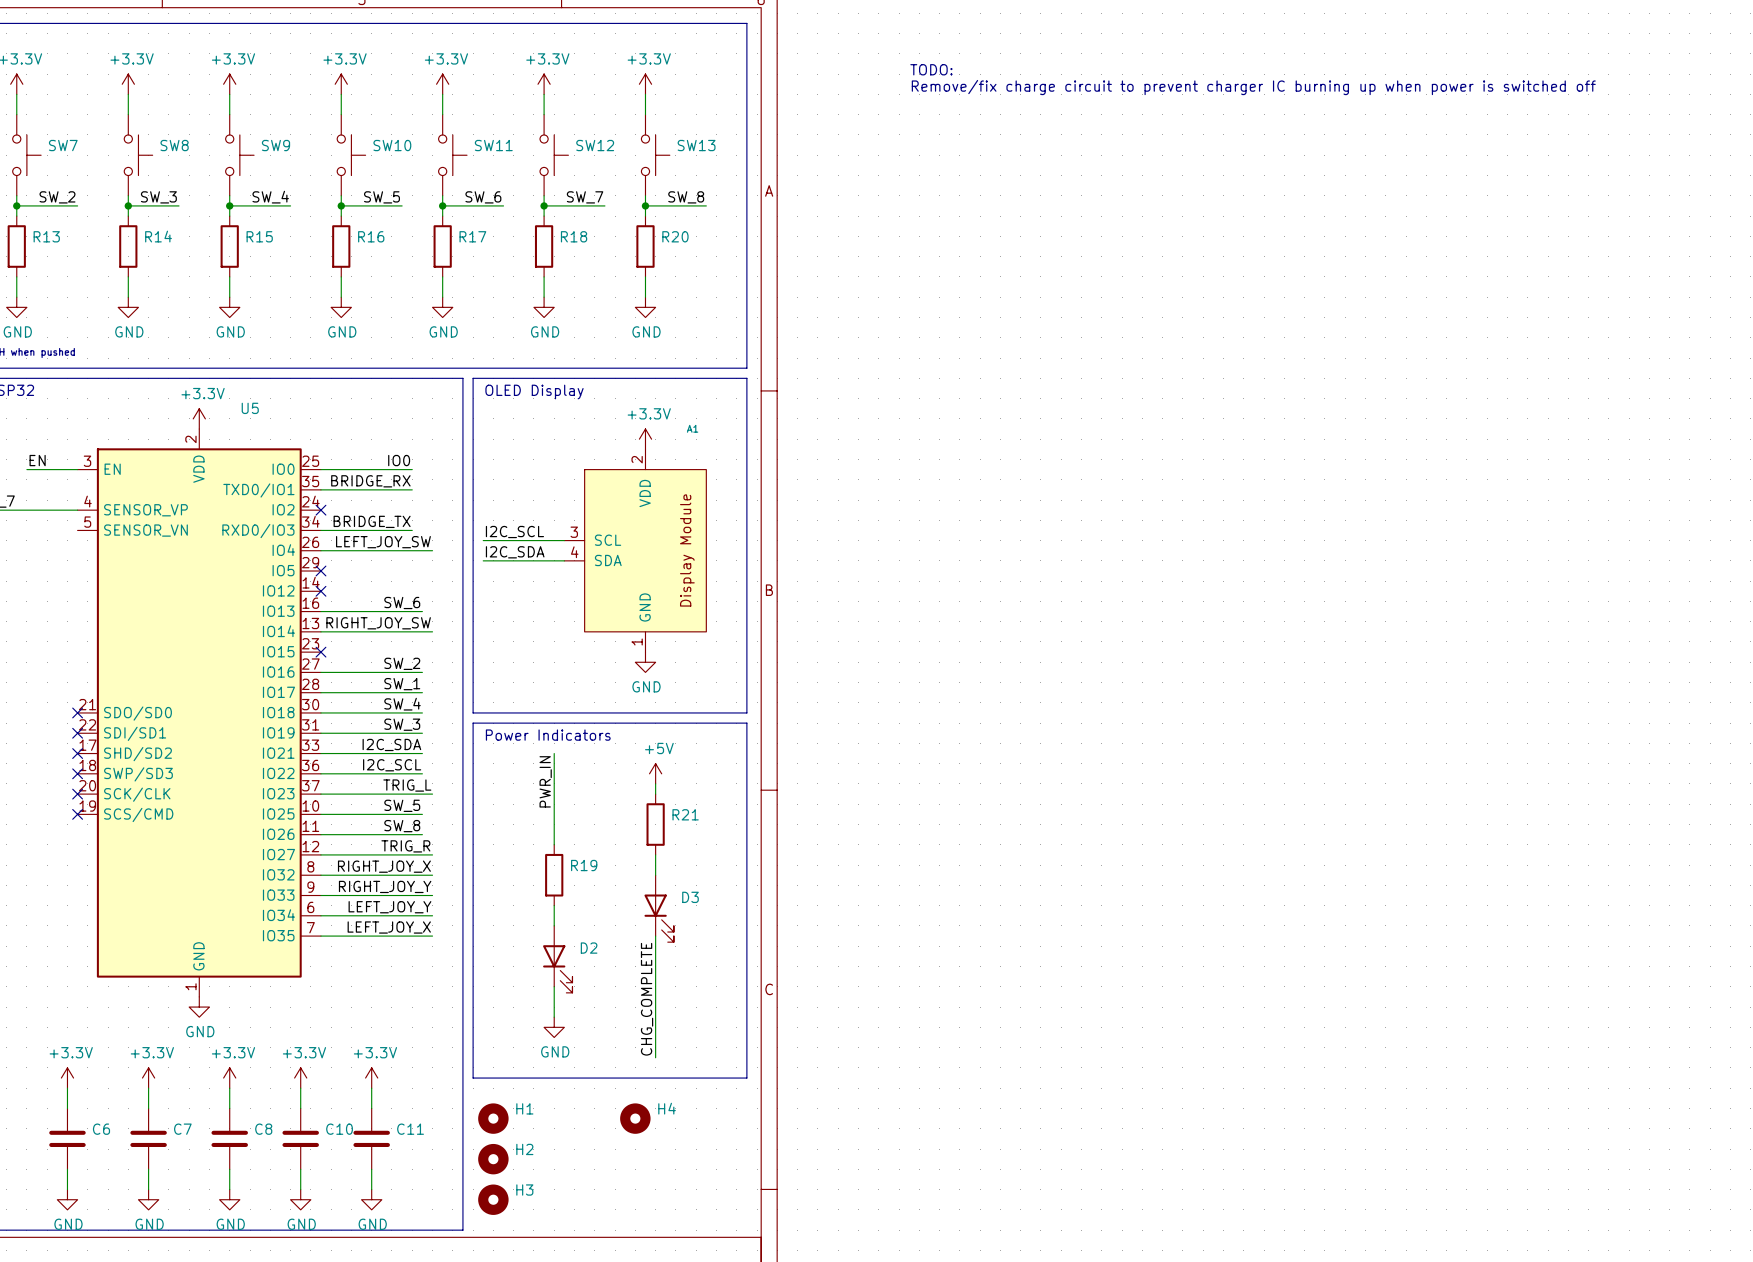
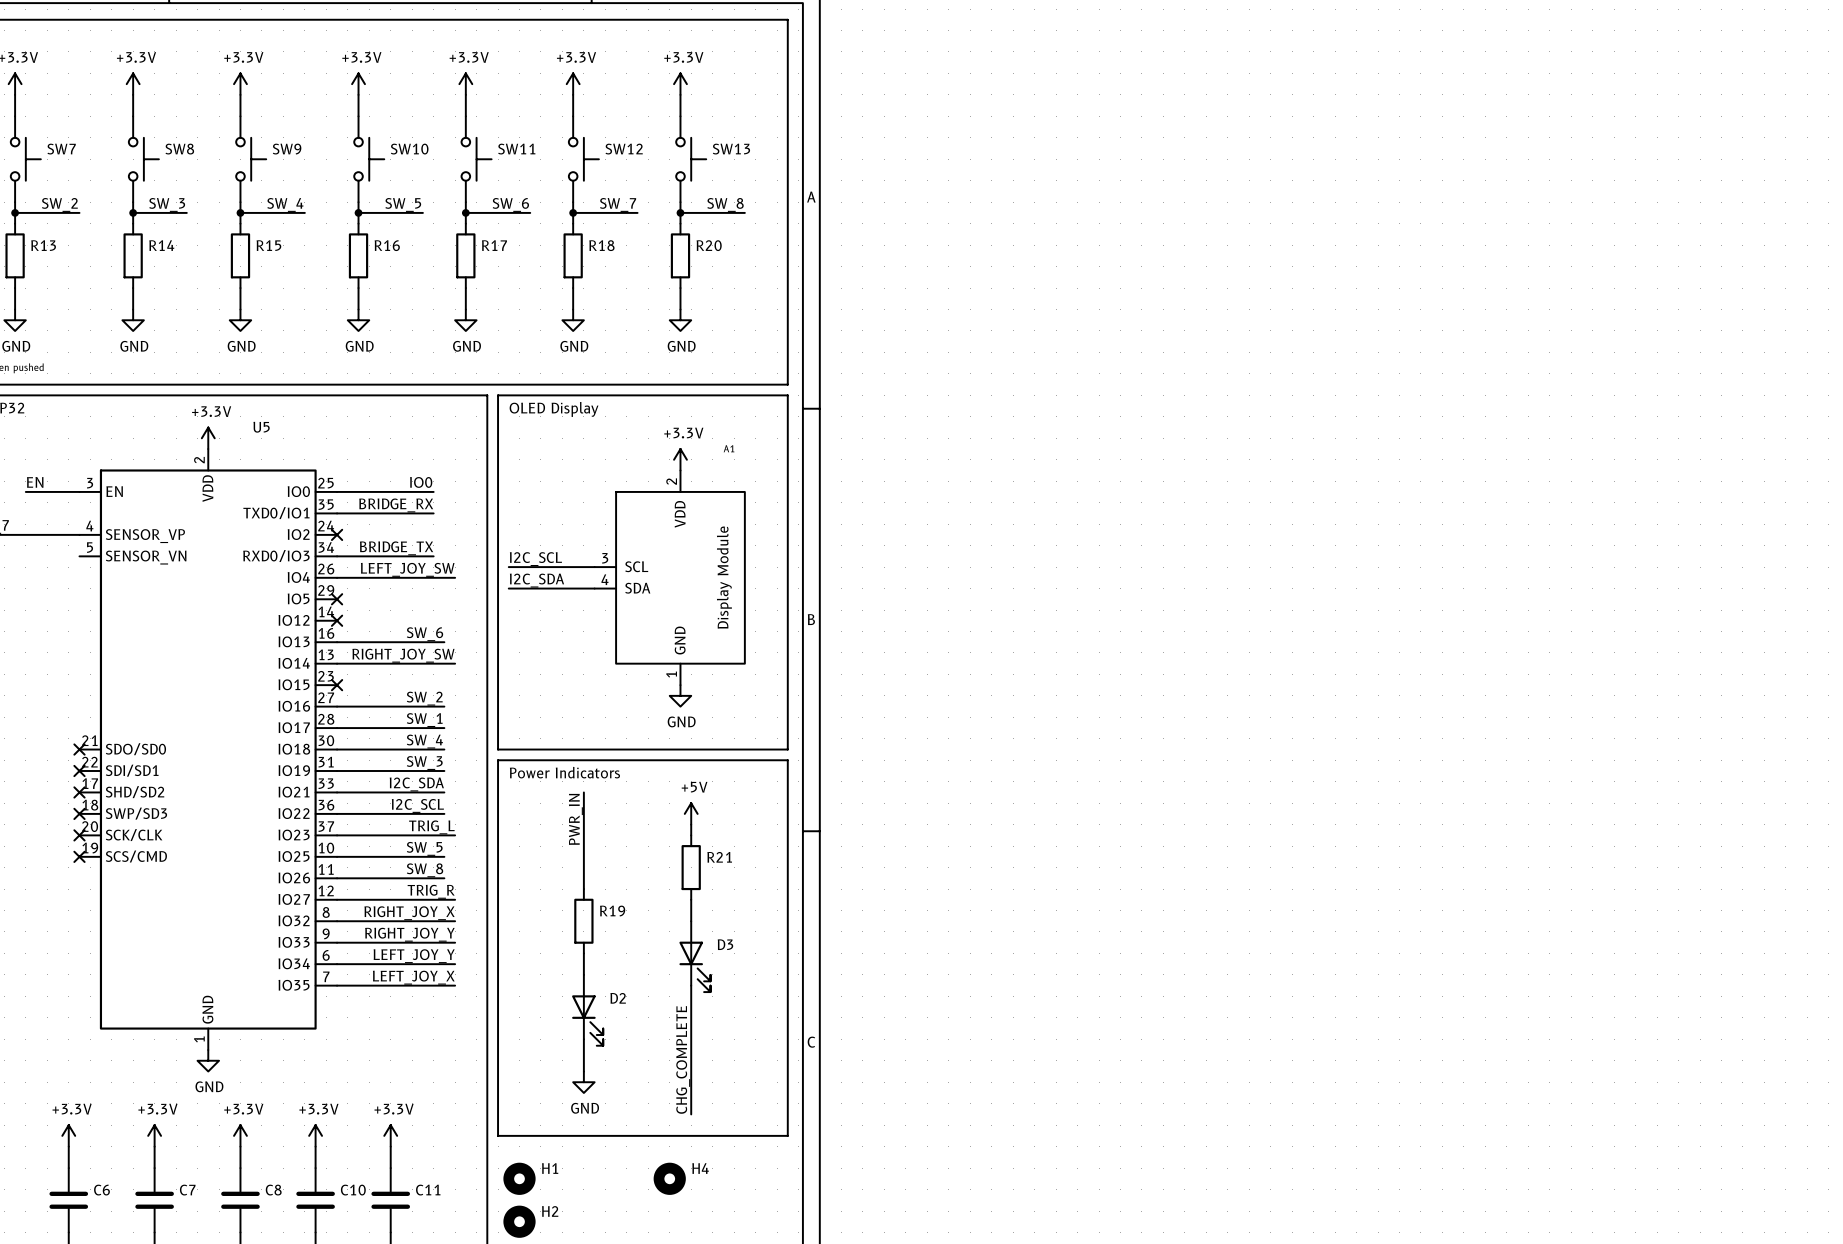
text: TODO: (931, 69) -> none
text: Remove/fix charge circuit to prevent charger IC burning up when power is switched off (1253, 87) -> none

